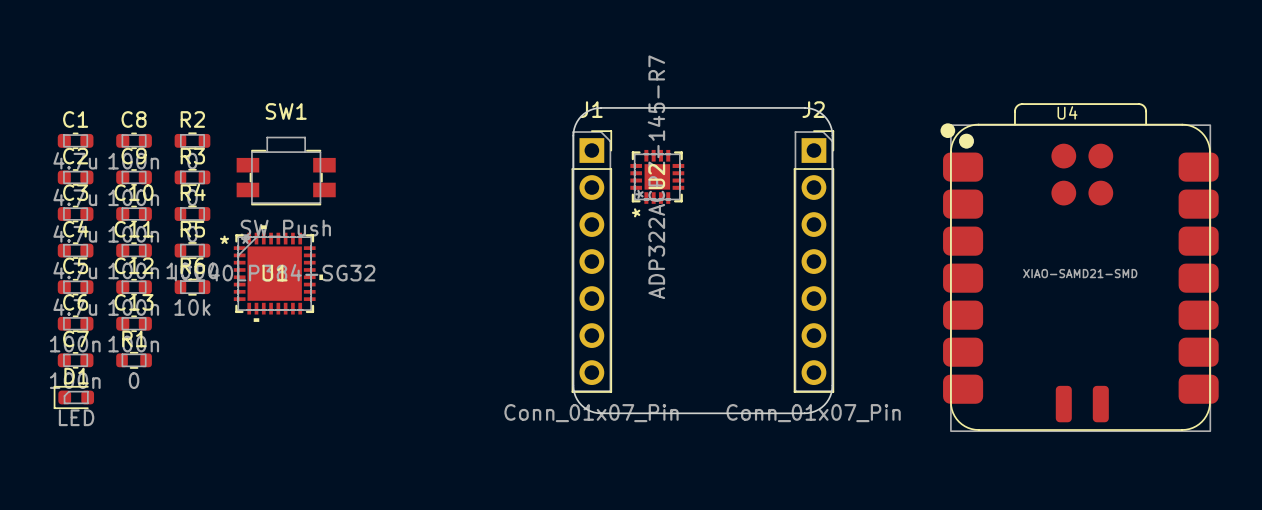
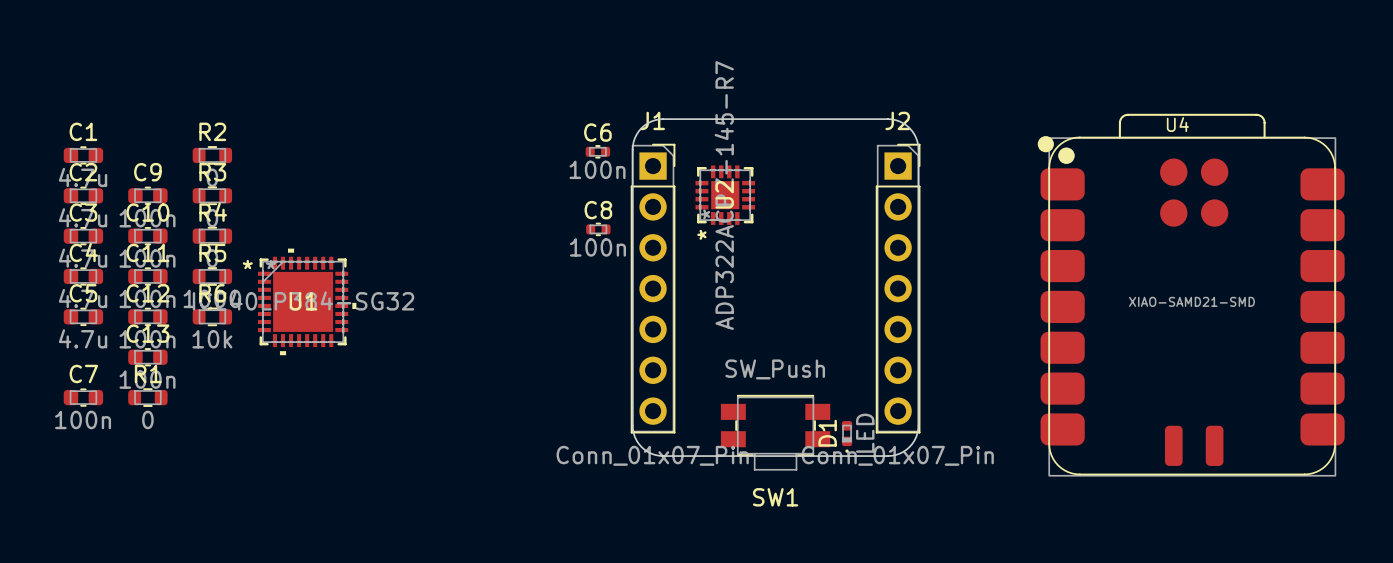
C8 footprint: [116, 132, 152, 150] -> [586, 222, 611, 237]
SW1 rotation: 0° (286, 171) -> 180° (775, 432)
SW1 position: (286, 171) -> (775, 432)
C6 footprint: [57, 315, 94, 333] -> [585, 145, 611, 159]
D1 footprint: [53, 385, 95, 410] -> [841, 421, 853, 453]

